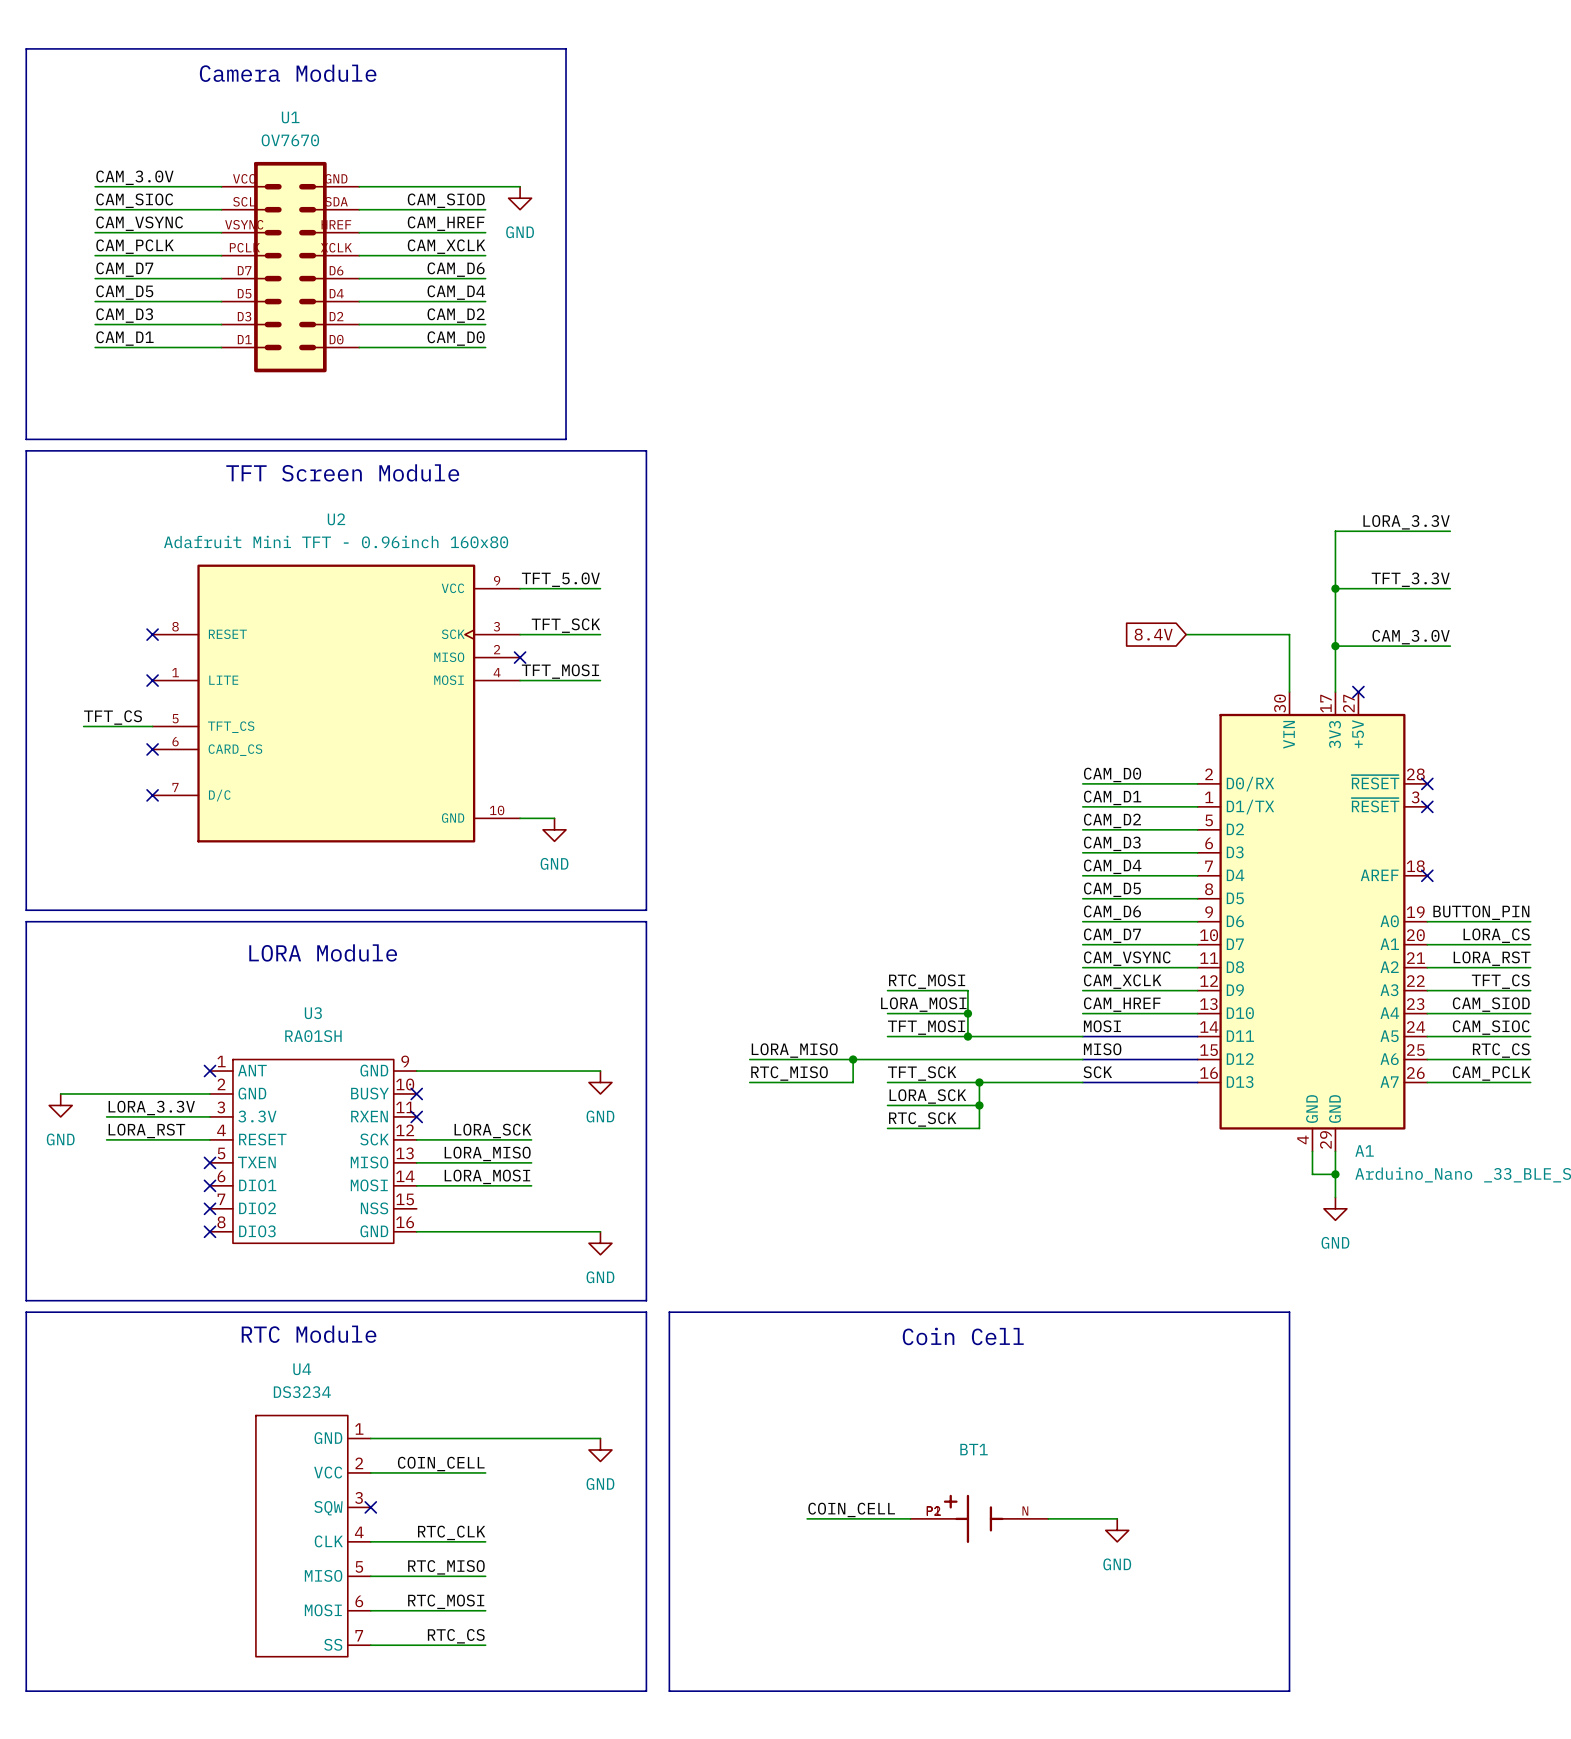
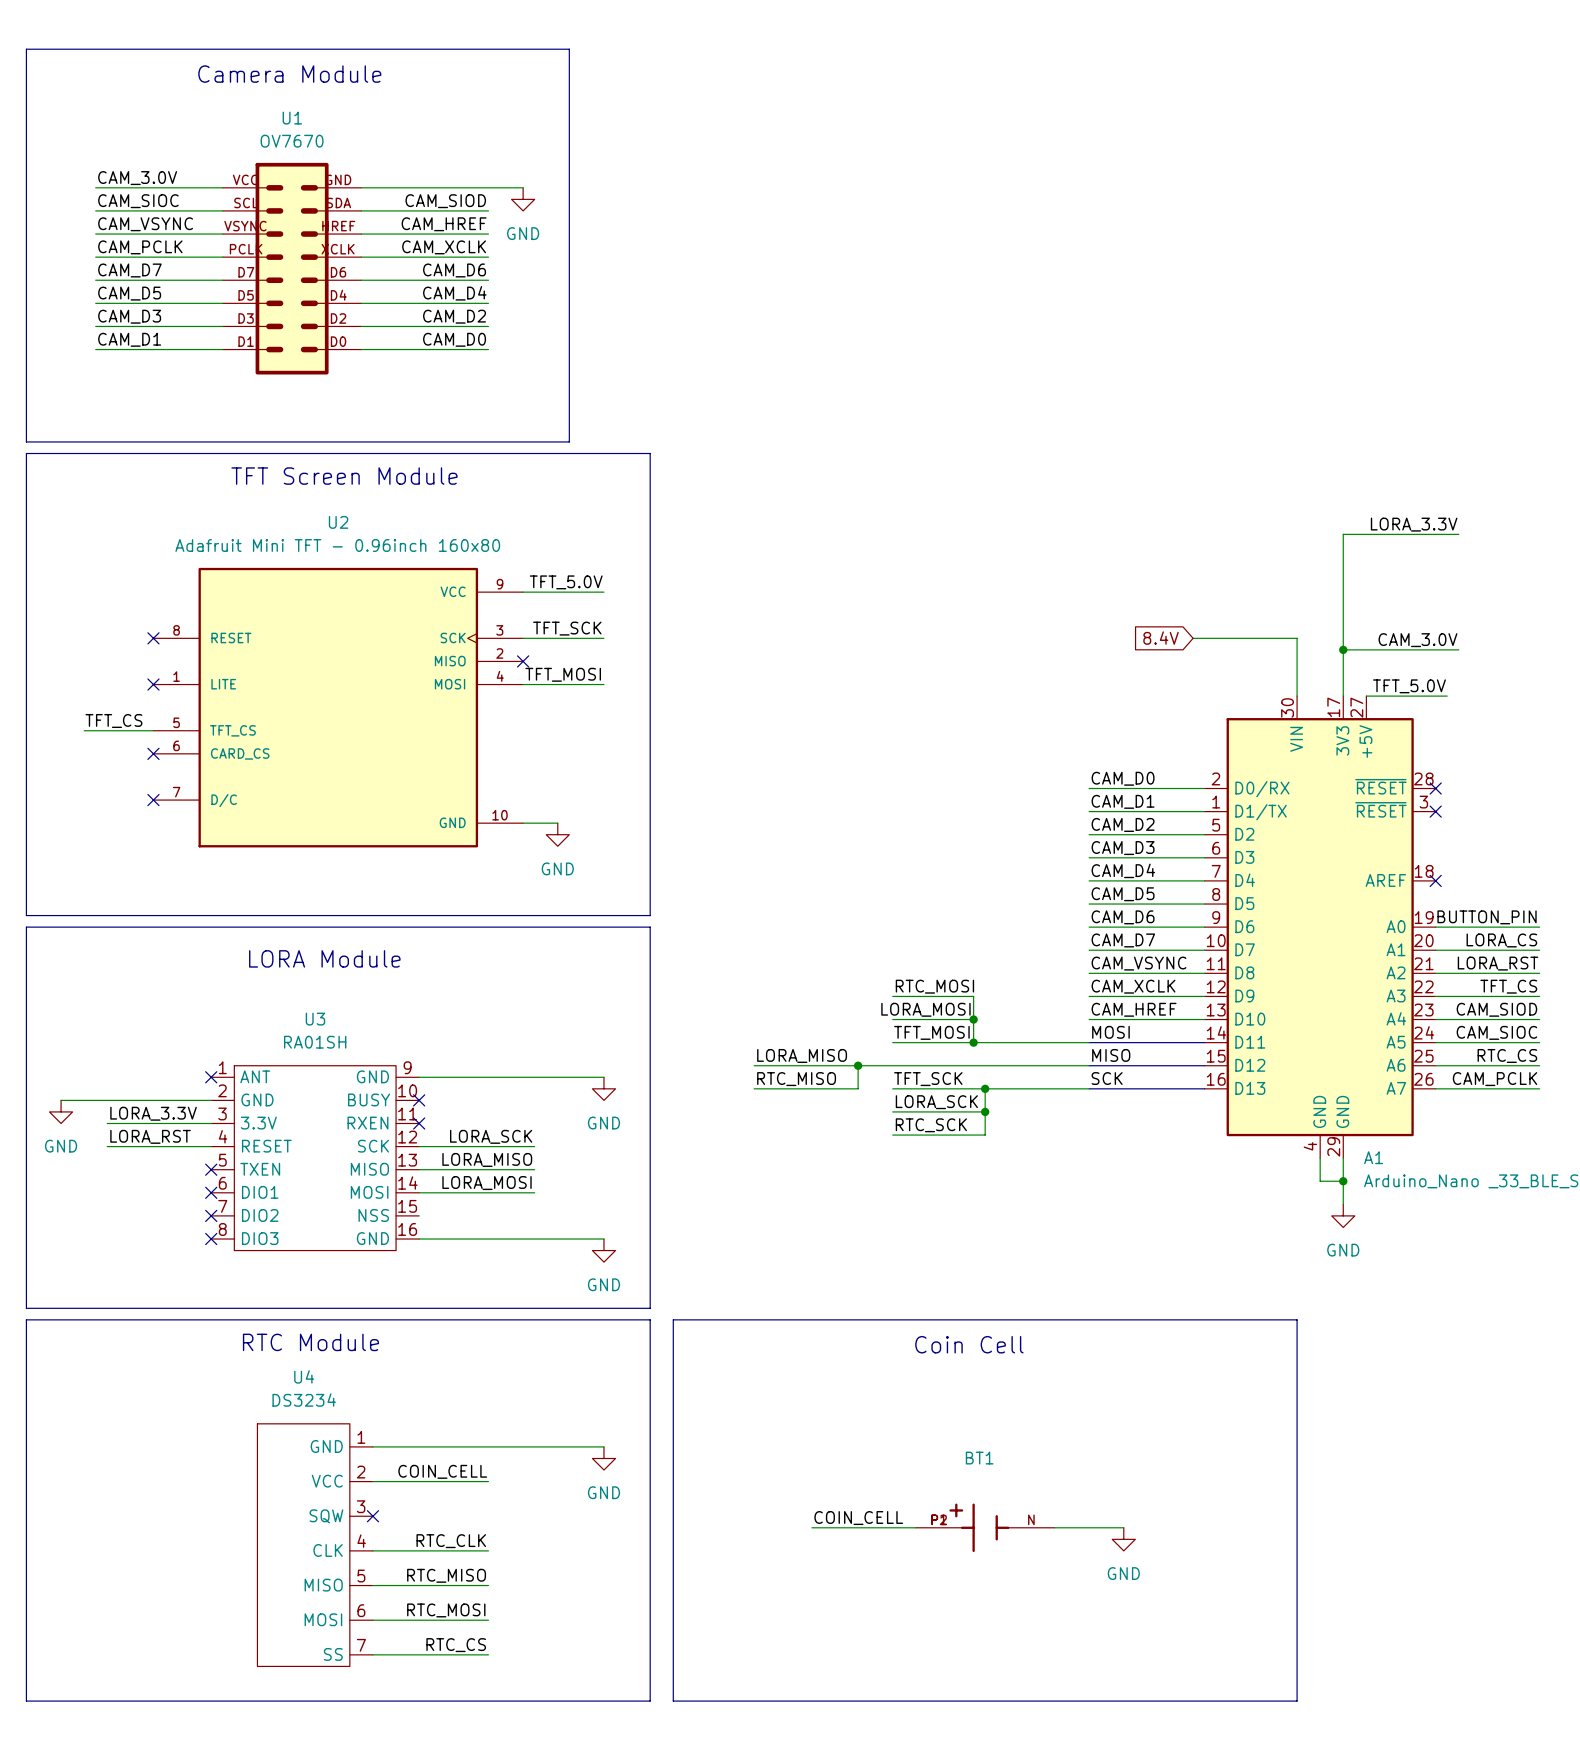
label: TFT_3.3V (1410, 579) -> none
wire: (1335, 588) (1450, 588) -> none
junction: (1335, 588) -> none
label: none -> TFT_5.0V (1409, 686)
wire: none -> (1366, 696) (1447, 696)
no-connect mark: (1358, 692) -> none

